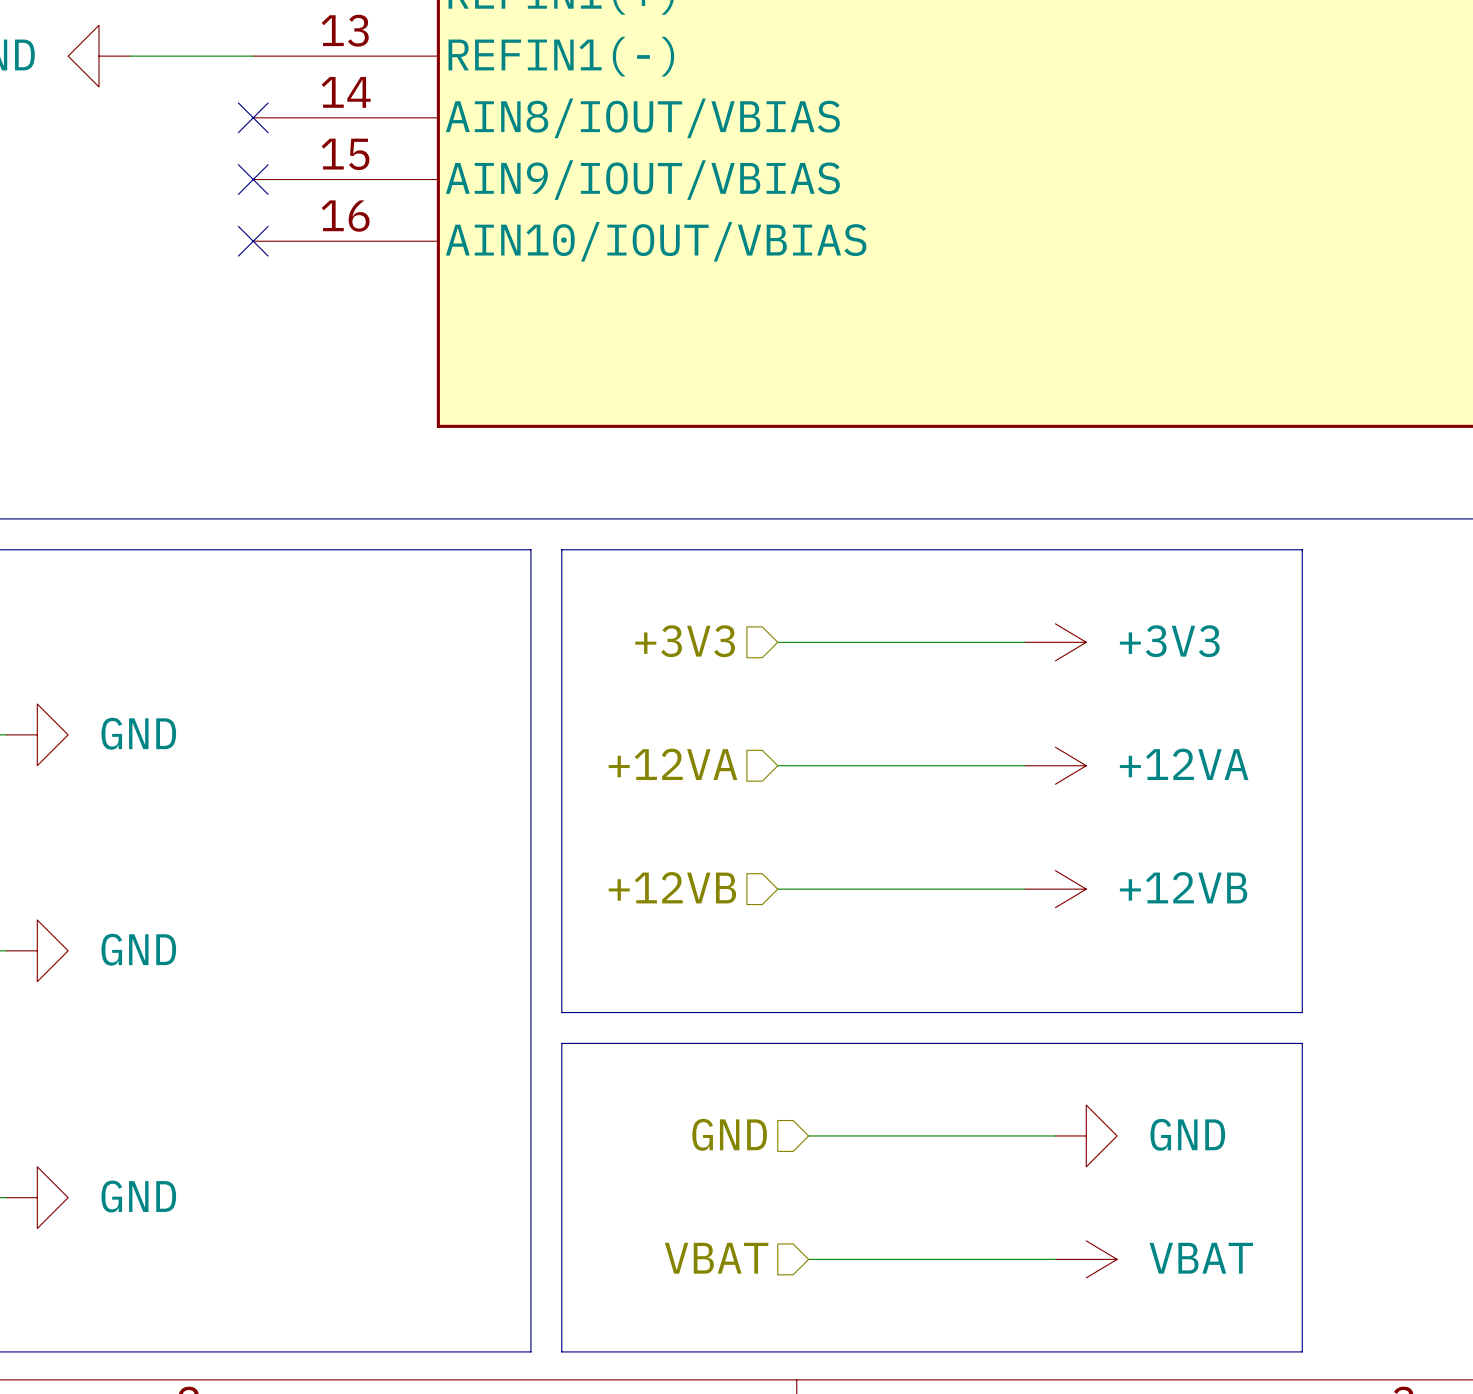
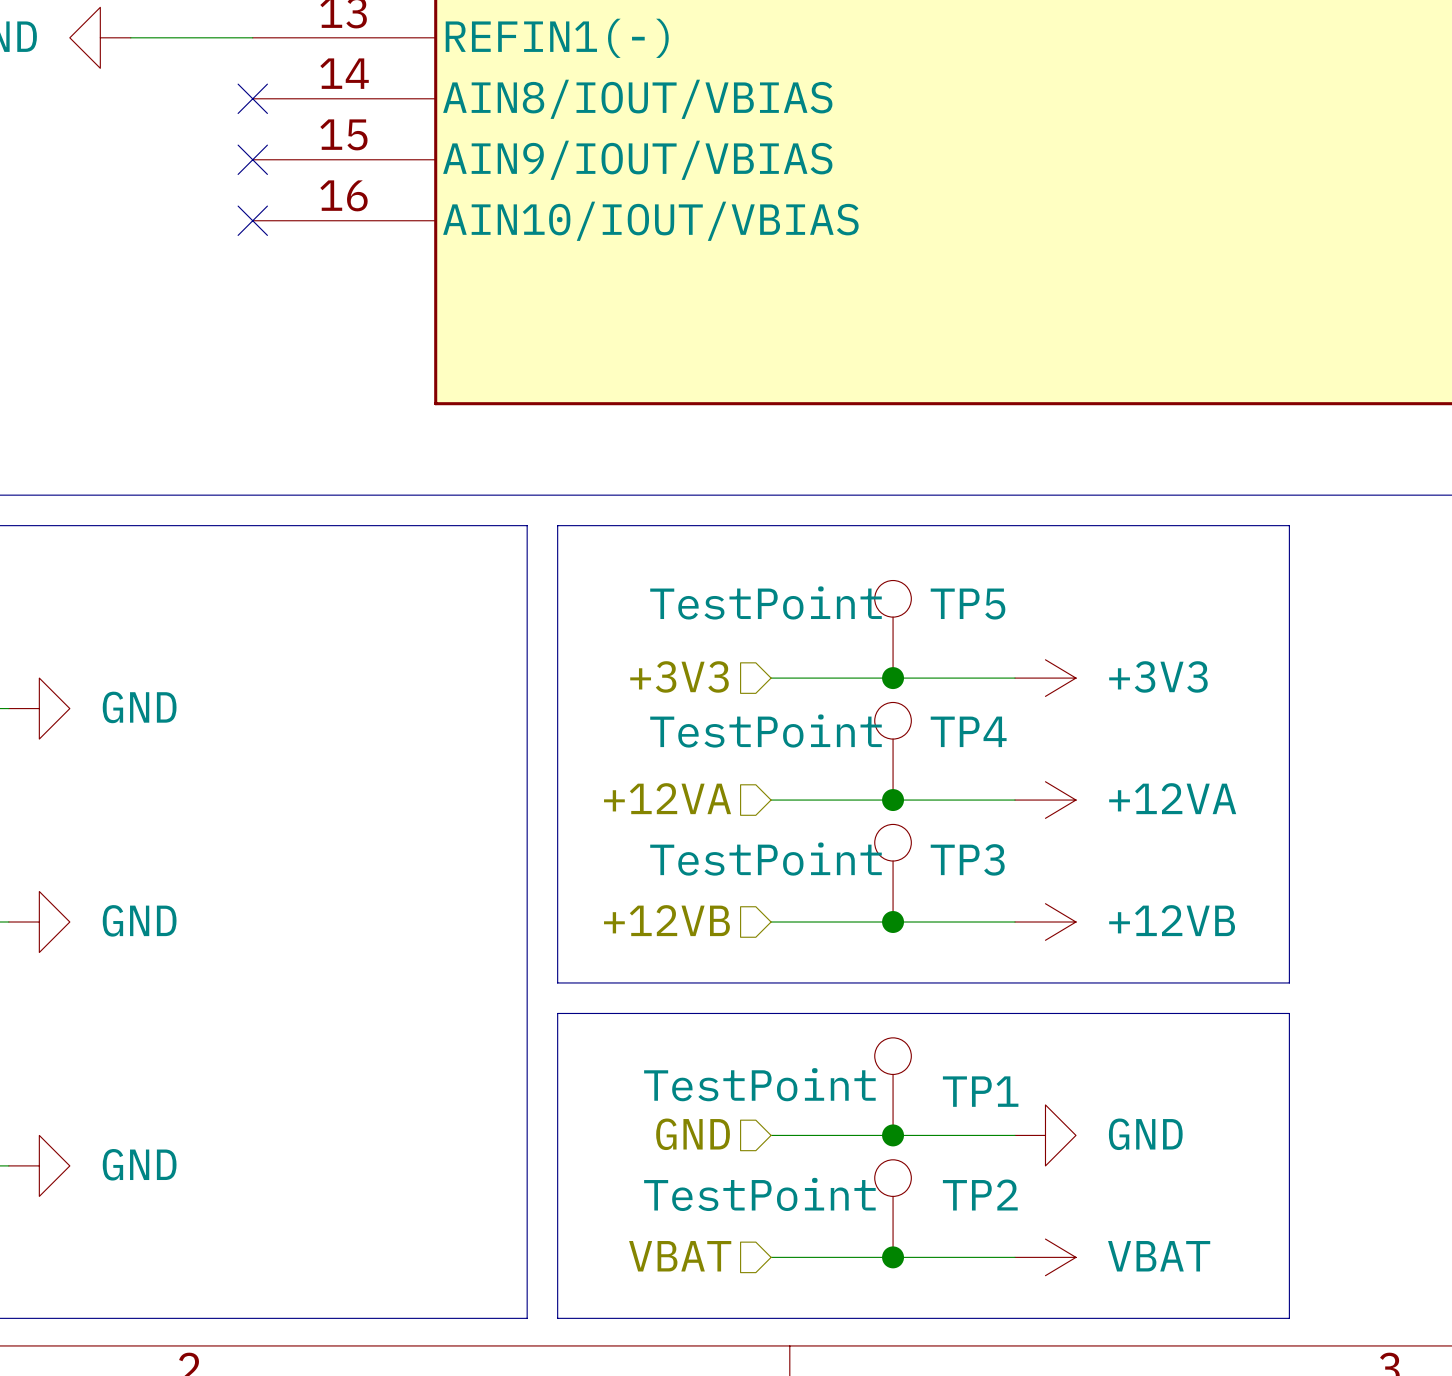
hierarchical label position: +3V3 (685, 641) -> +3V3 (679, 676)
wire: (777, 642) (1024, 642) -> (771, 678) (1014, 678)
power symbol position: +3V3 (1055, 642) -> +3V3 (1045, 678)
TP5: none -> TestPoint (893, 629)
junction: none -> (893, 678)
hierarchical label position: +12VA (672, 764) -> +12VA (667, 798)
wire: (777, 765) (1024, 765) -> (771, 800) (1014, 800)
power symbol position: +12VA (1055, 765) -> +12VA (1045, 800)
TP4: none -> TestPoint (893, 751)
junction: none -> (893, 800)
hierarchical label position: +12VB (672, 887) -> +12VB (666, 920)
wire: (777, 889) (1024, 889) -> (771, 922) (1014, 922)
power symbol position: +12VB (1055, 889) -> +12VB (1045, 922)
TP3: none -> TestPoint (893, 873)
junction: none -> (893, 922)
TP1: none -> TestPoint (893, 1086)
hierarchical label position: GND (729, 1134) -> GND (693, 1134)
wire: (808, 1135) (1055, 1135) -> (771, 1135) (1014, 1135)
power symbol position: GND (1086, 1135) -> GND (1045, 1135)
junction: none -> (893, 1135)
TP2: none -> TestPoint (893, 1208)
hierarchical label position: VBAT (716, 1258) -> VBAT (680, 1256)
wire: (808, 1259) (1055, 1259) -> (771, 1257) (1014, 1257)
power symbol position: VBAT (1086, 1259) -> VBAT (1045, 1257)
junction: none -> (893, 1257)

